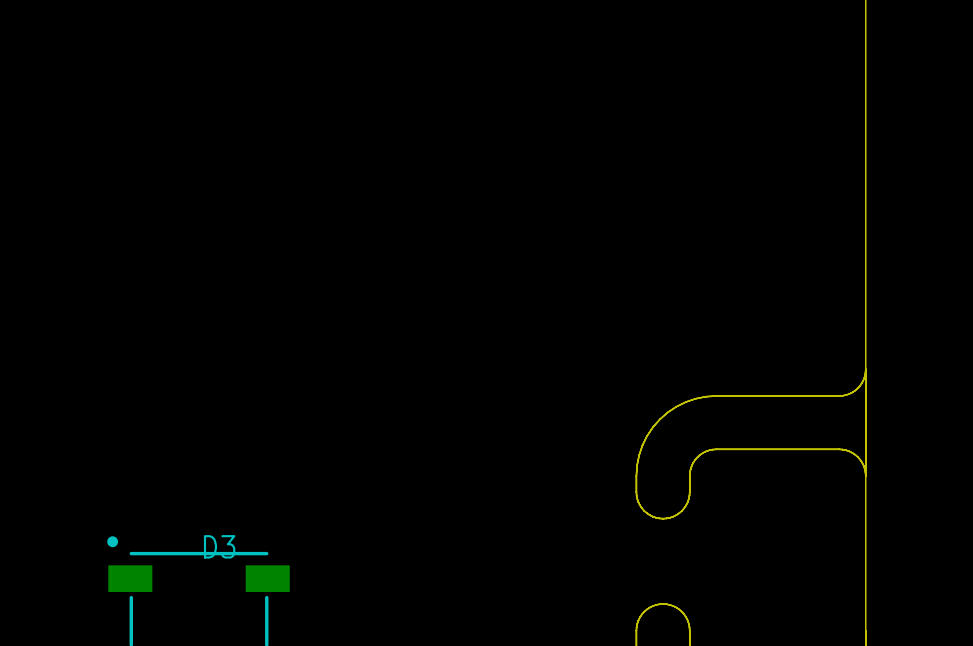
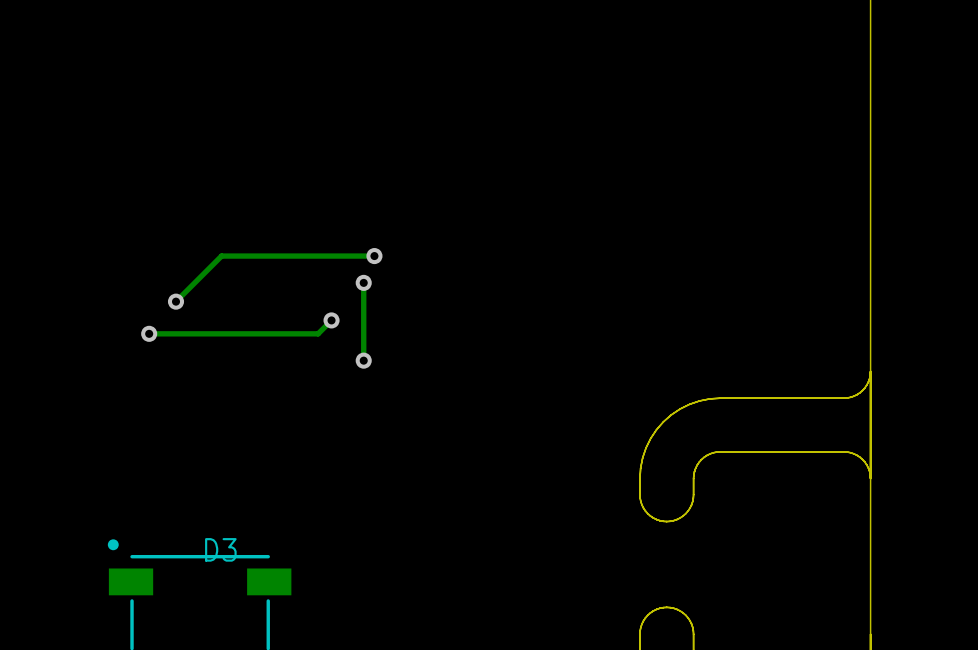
track: none -> (374, 256) (221, 256) (176, 301)
via: none -> (374, 256)
track: none -> (363, 282) (363, 360)
via: none -> (363, 282)
via: none -> (176, 301)
track: none -> (331, 320) (318, 333) (149, 333)
via: none -> (331, 320)
via: none -> (149, 333)
via: none -> (363, 360)

